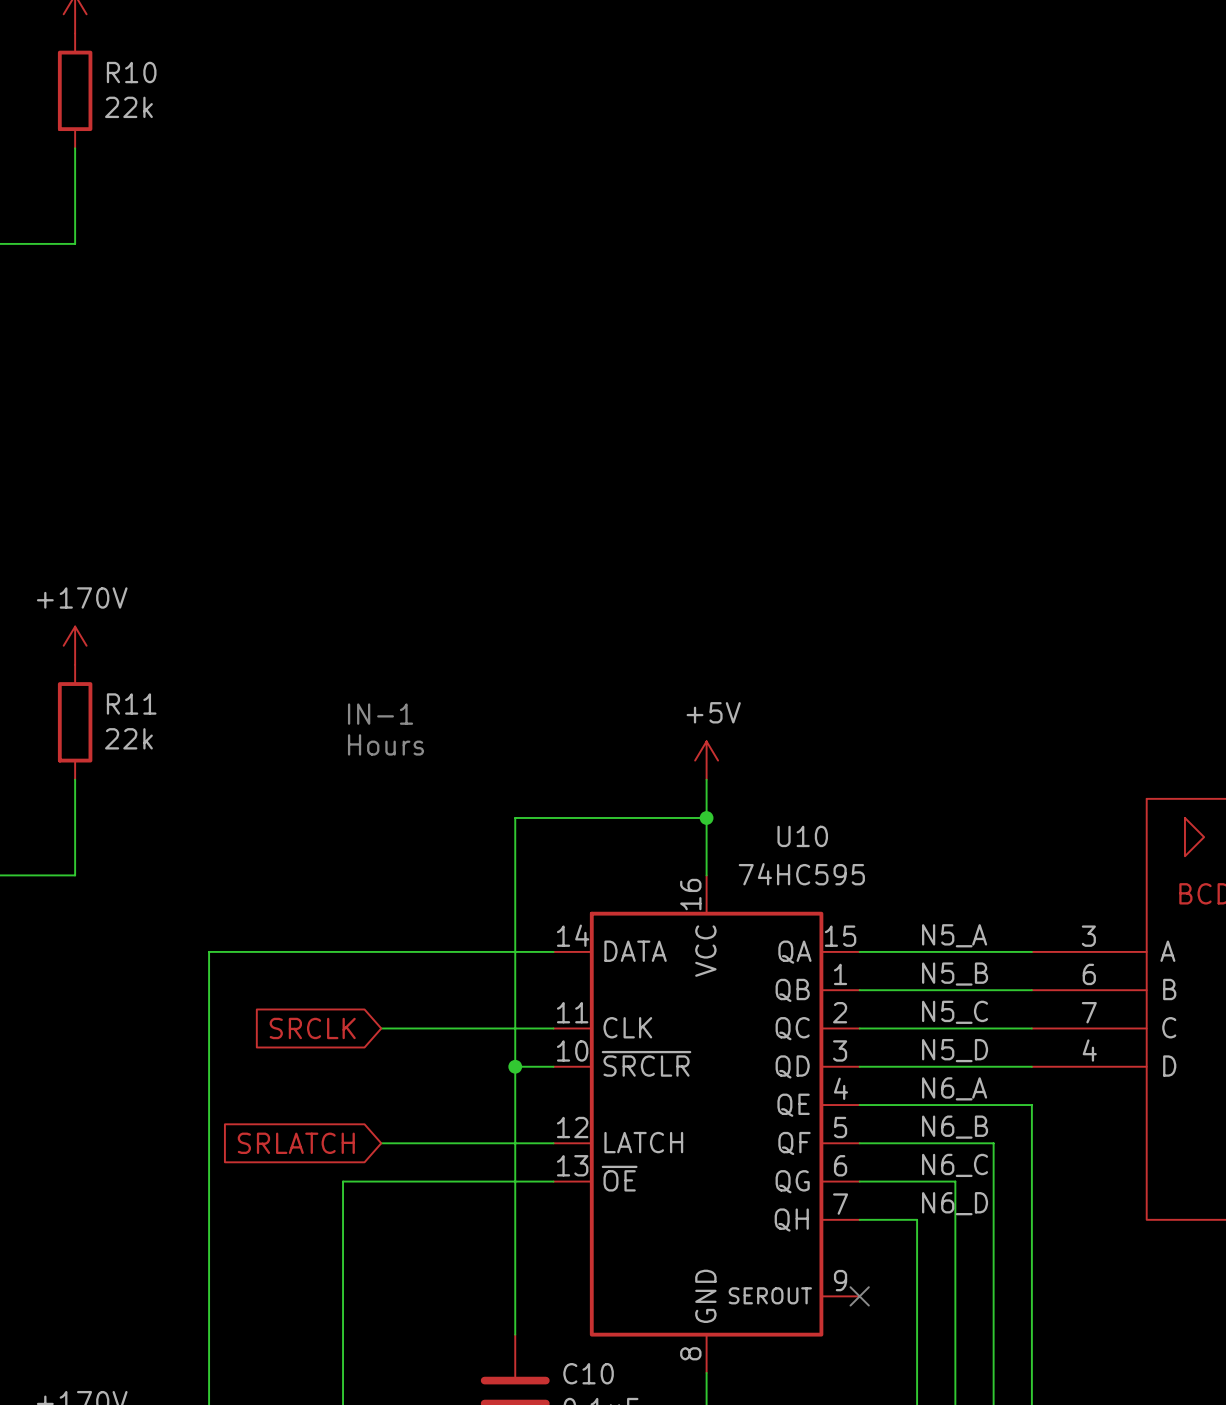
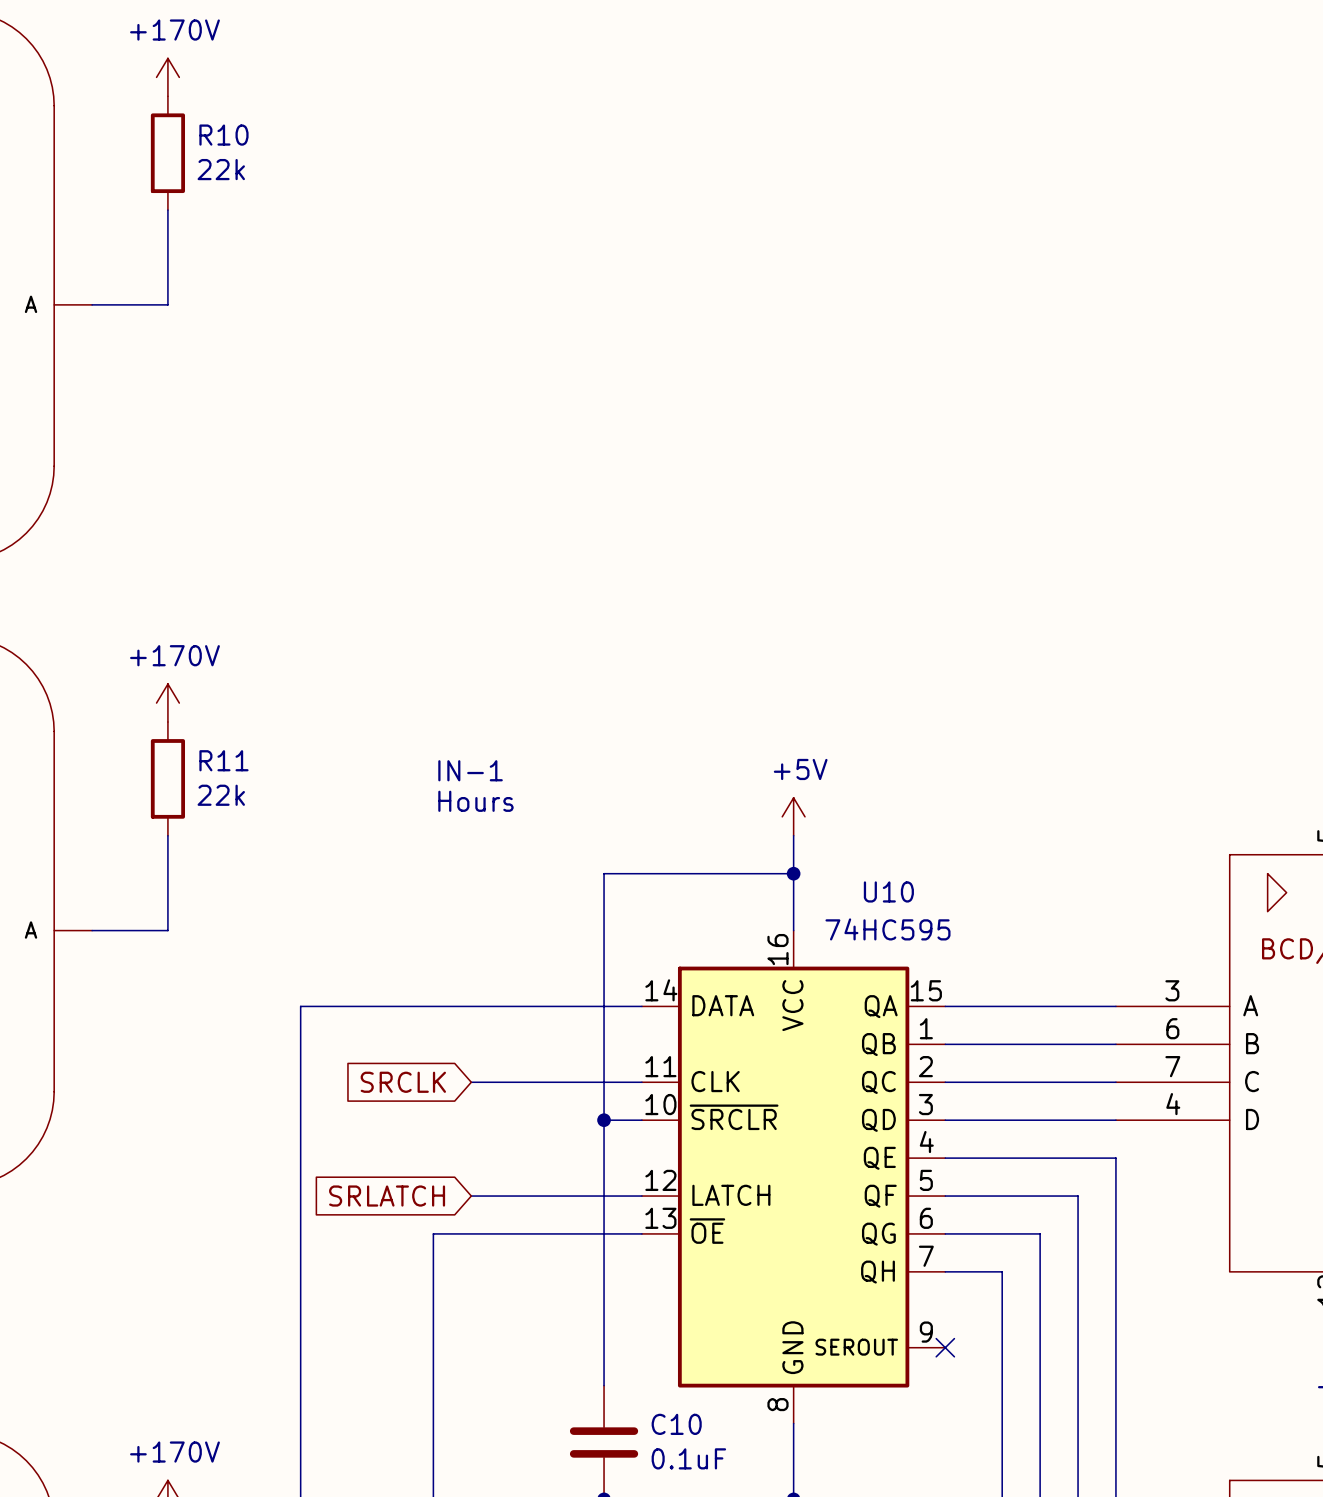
label: N5_A (954, 935) -> none
label: N5_B (955, 974) -> none
label: N5_C (955, 1012) -> none
label: N5_D (955, 1050) -> none
label: N6_A (954, 1088) -> none
label: N6_B (955, 1127) -> none
label: N6_C (955, 1165) -> none
label: N6_D (955, 1203) -> none

